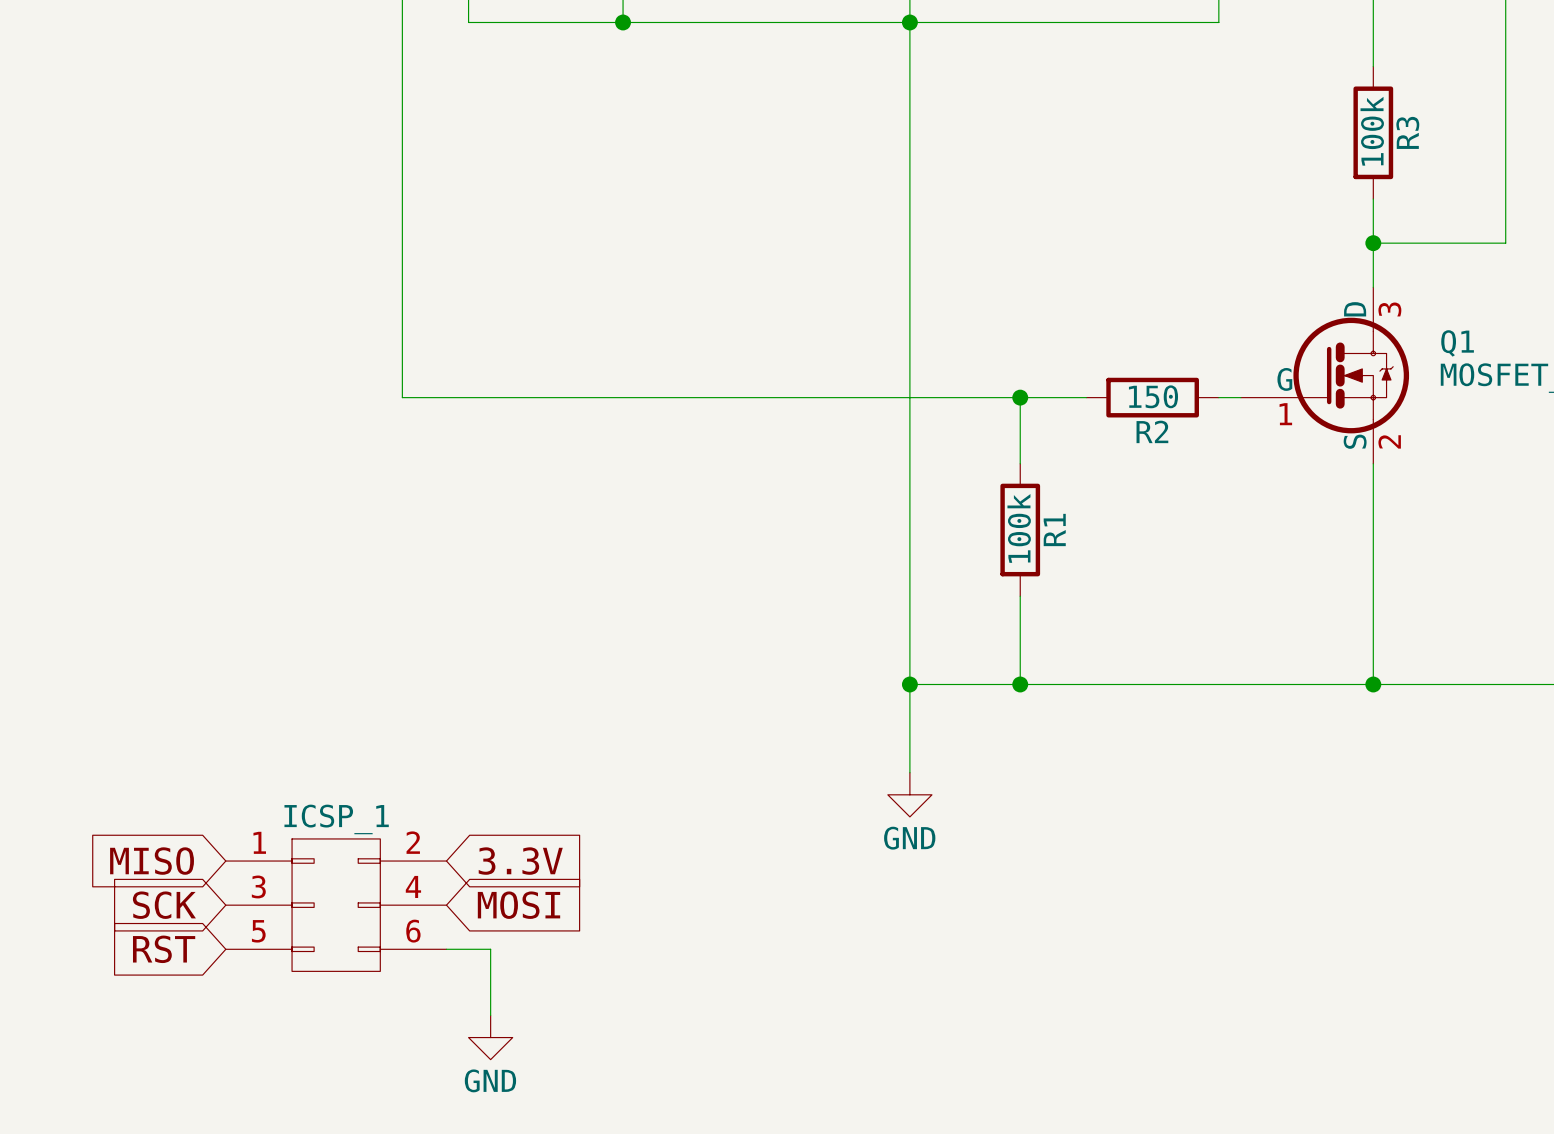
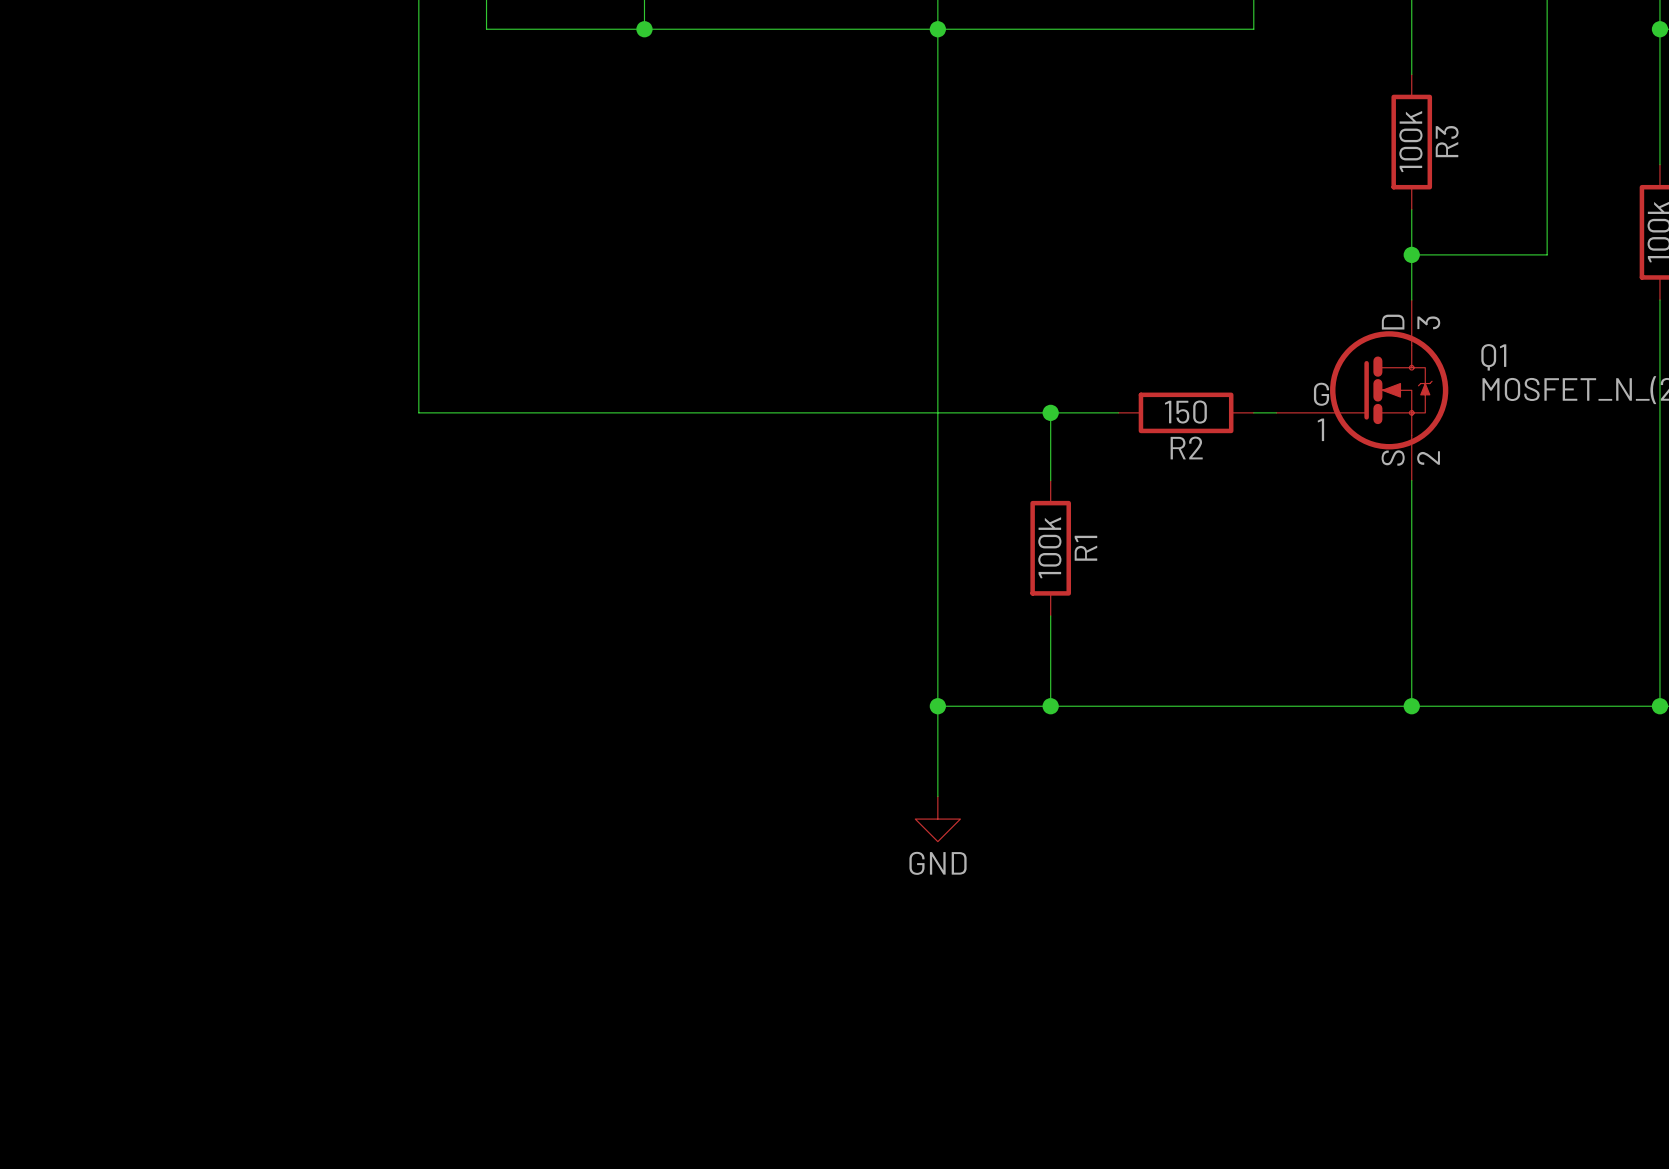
global label: MISO (152, 861) -> none
global label: 3.3V (520, 861) -> none
global label: SCK (164, 905) -> none
ICSP_1: (336, 905) -> none
global label: MOSI (518, 905) -> none
global label: RST (164, 949) -> none
wire: (446, 949) (490, 949) (490, 1015) -> none
power symbol: GND (490, 1037) -> none

